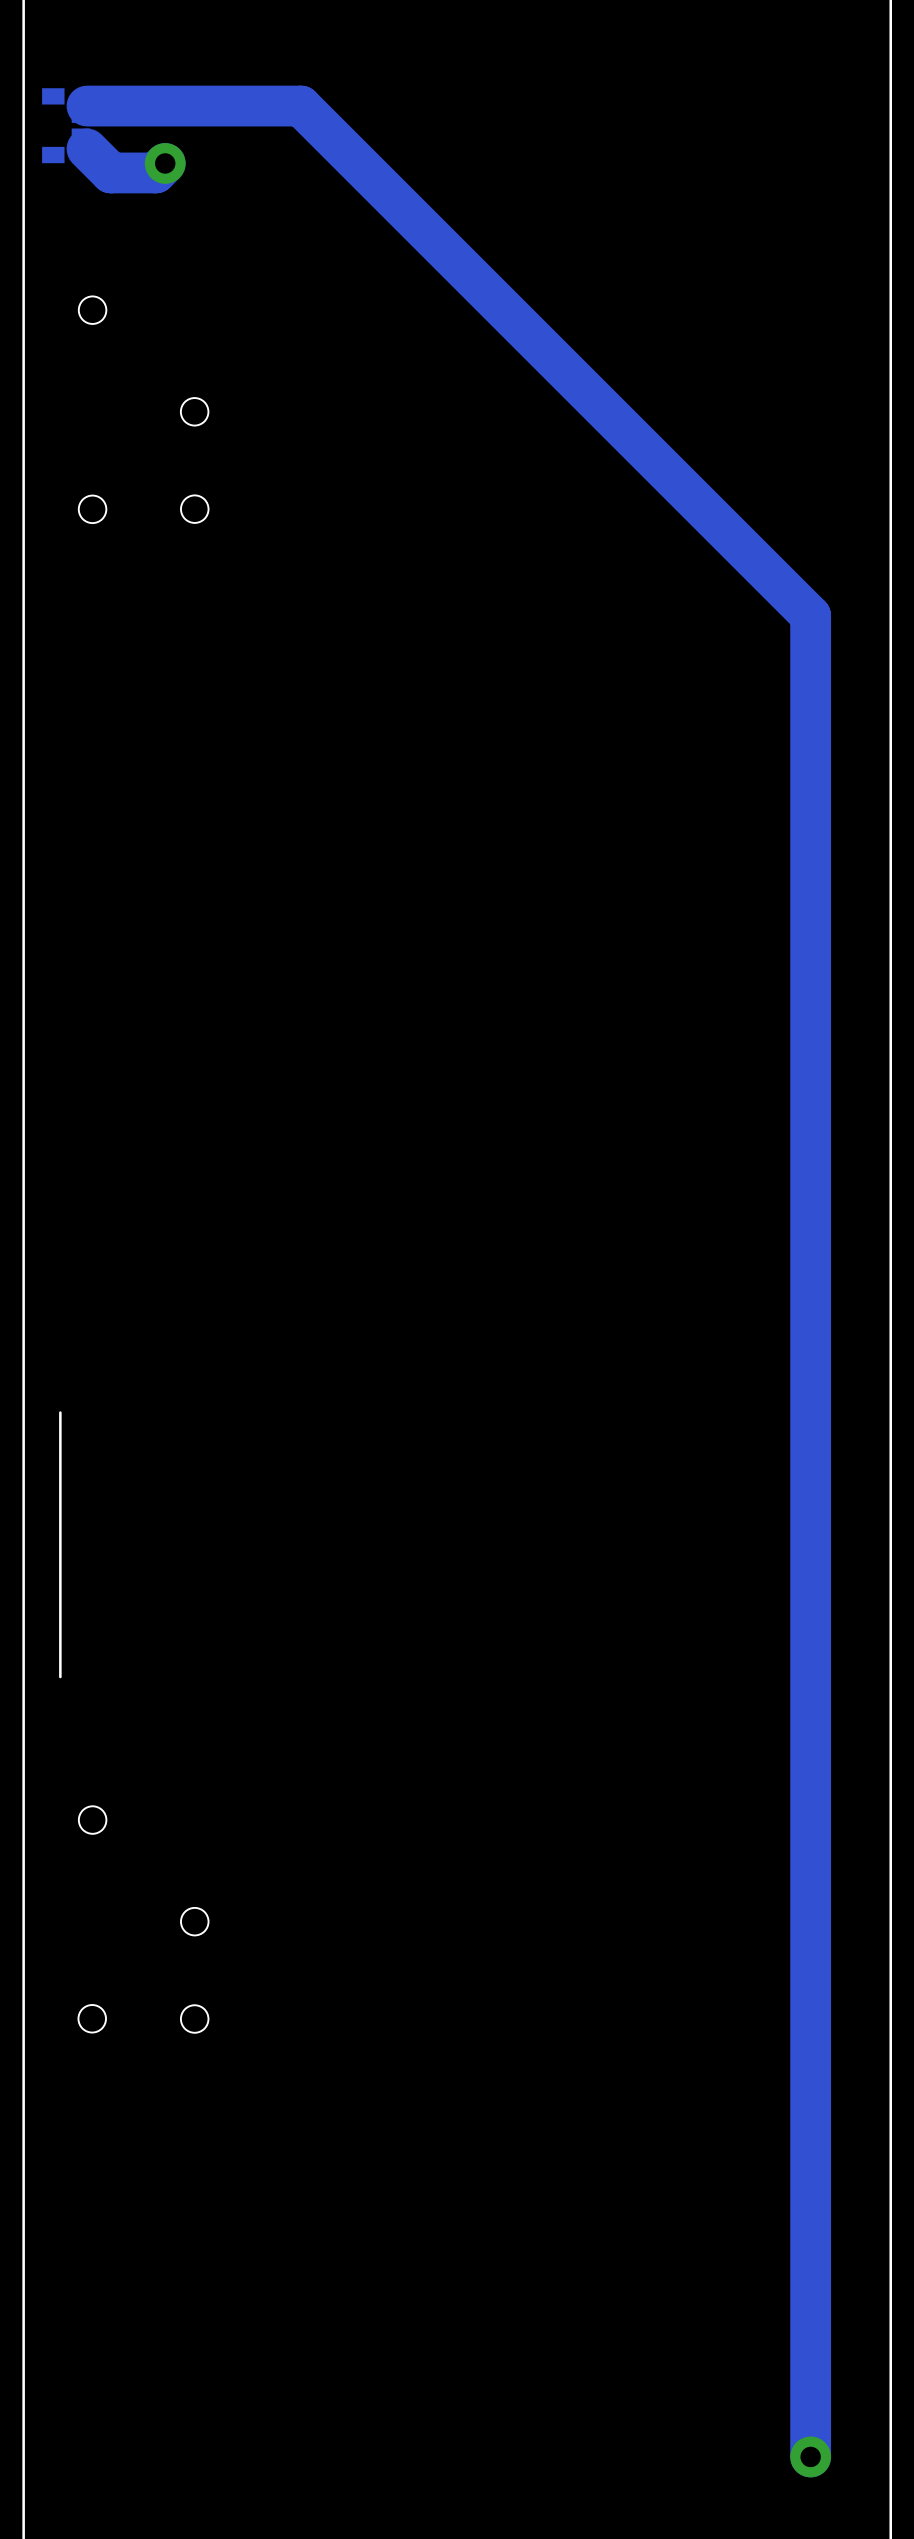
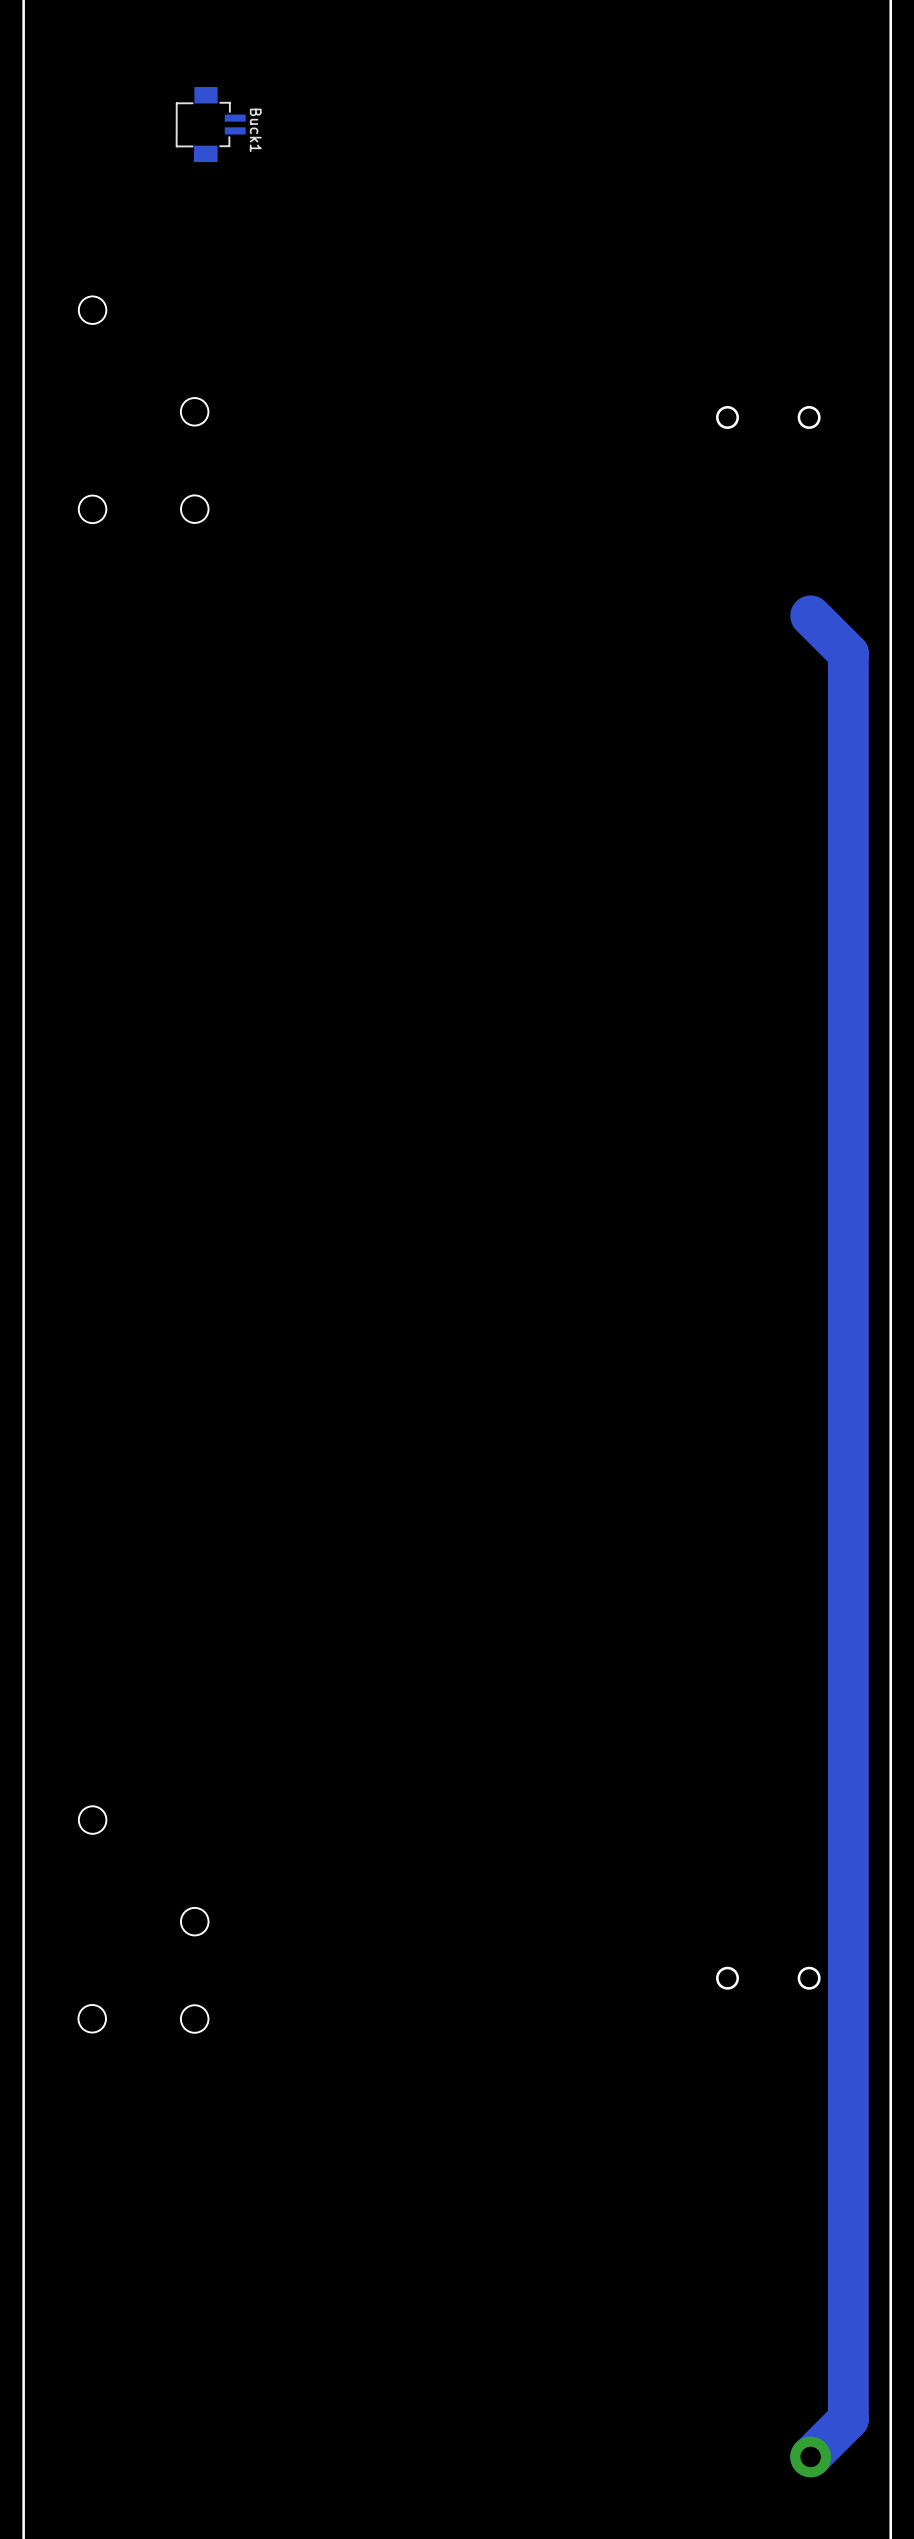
track: (86, 106) (300, 106) (810, 615) (810, 2456) -> (810, 615) (848, 653) (848, 2419) (810, 2456)
Buck1: none -> (210, 124)
part: (66, 125) -> none
track: (86, 148) (111, 172) (155, 172) (165, 163) -> none
via: (165, 163) -> none
round board edge: none -> [716, 406, 739, 429]
round board edge: none -> [797, 406, 821, 429]
board edge: (60, 1412) (60, 1677) -> none
round board edge: none -> [716, 1966, 739, 1990]
round board edge: none -> [797, 1966, 821, 1990]

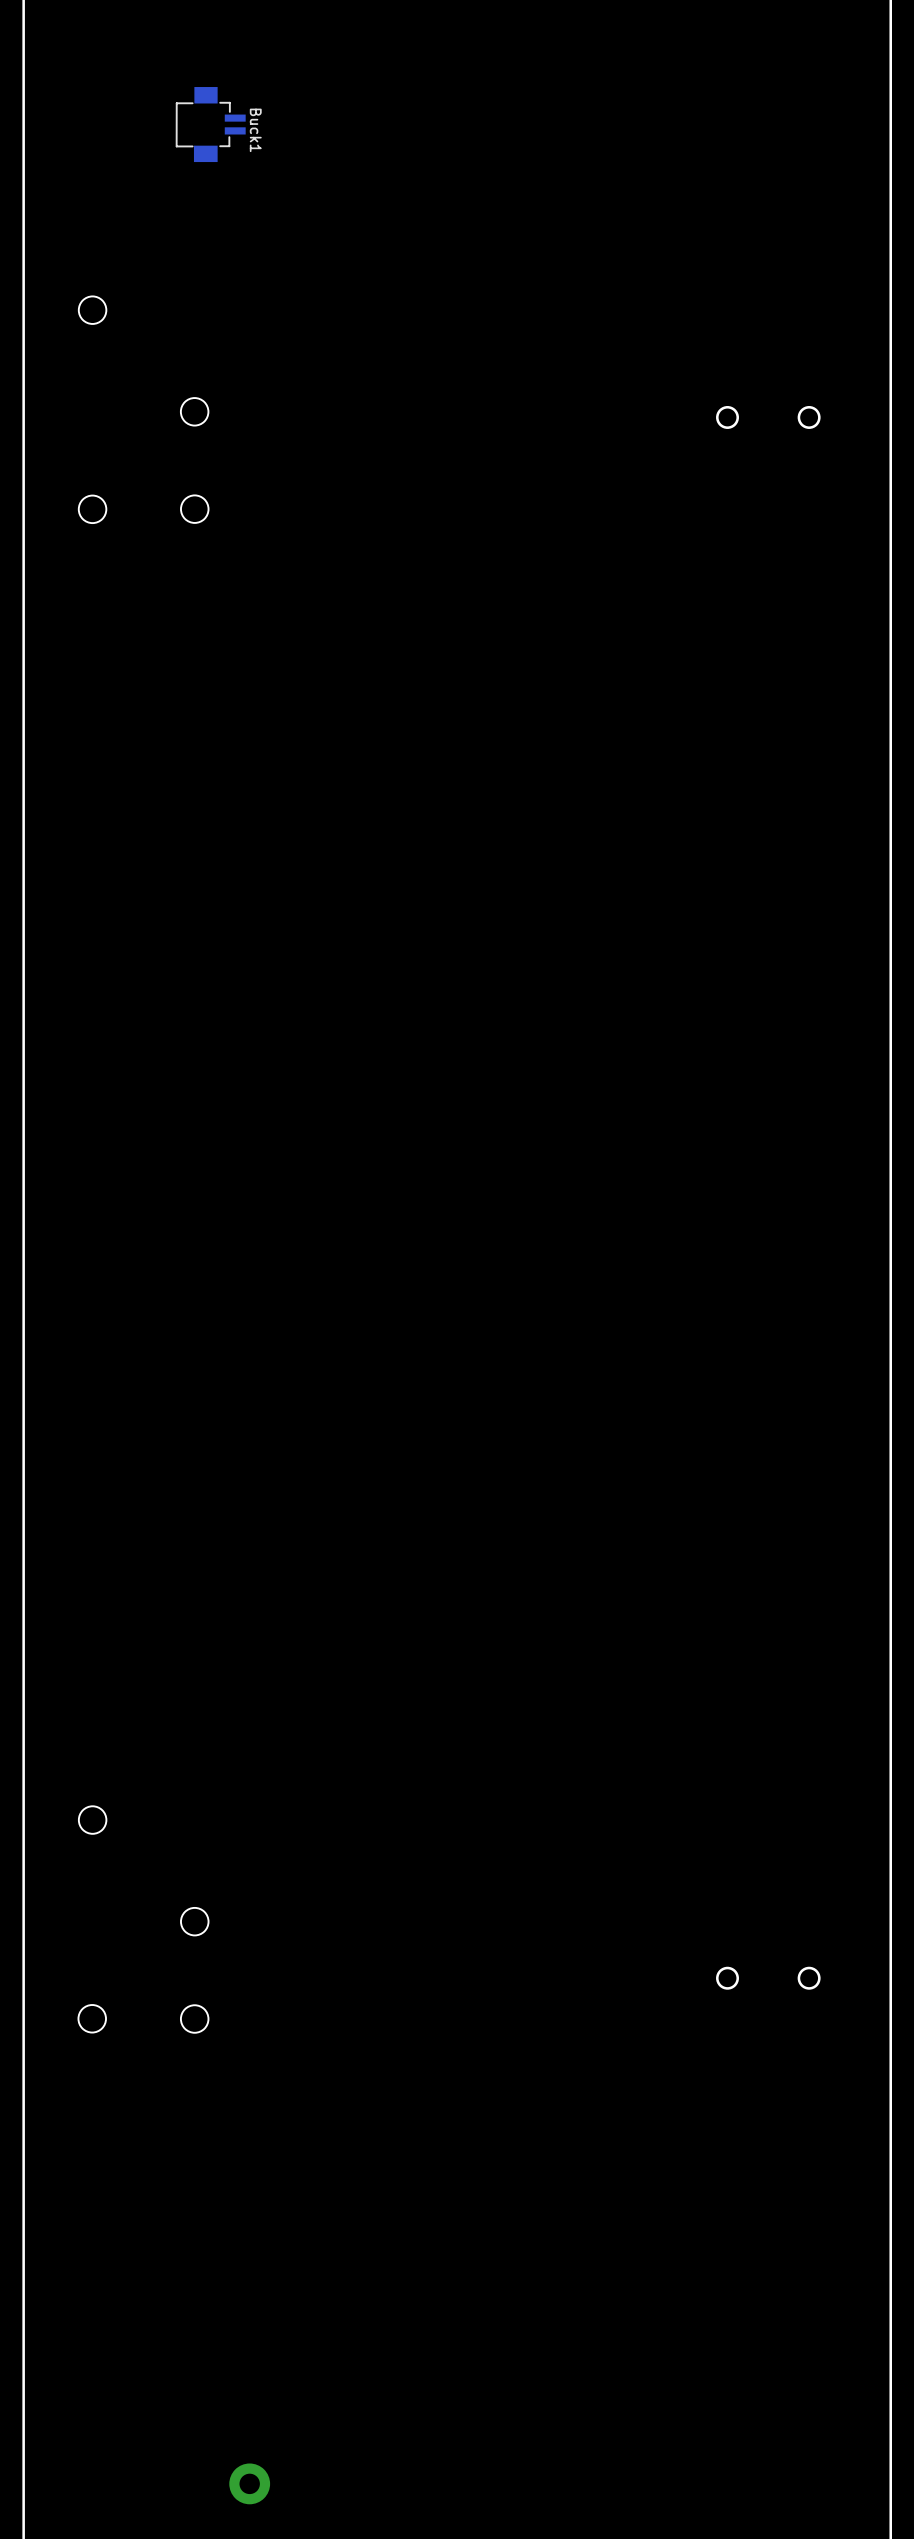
track: (810, 615) (848, 653) (848, 2419) (810, 2456) -> none
via: (810, 2456) -> none
via: none -> (249, 2483)

